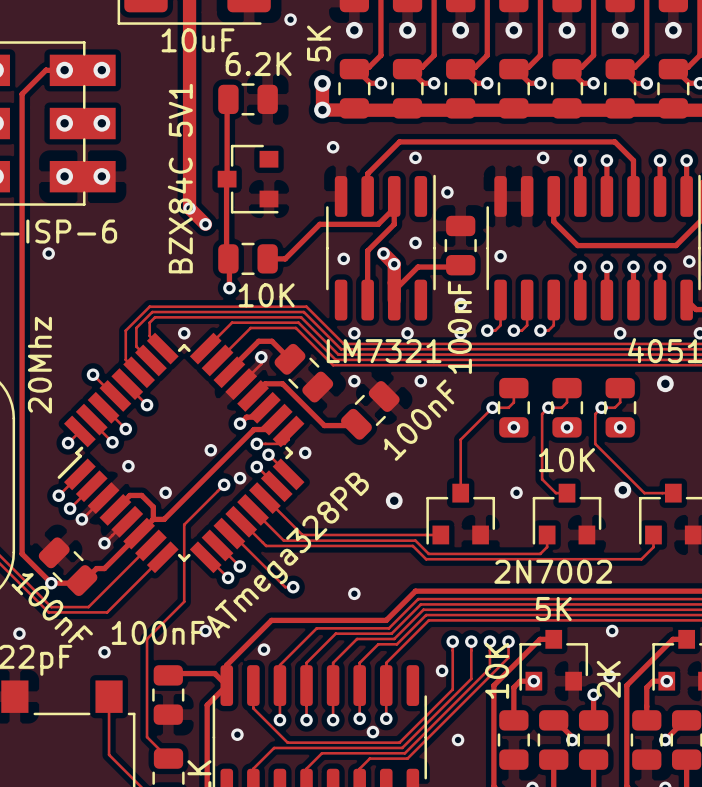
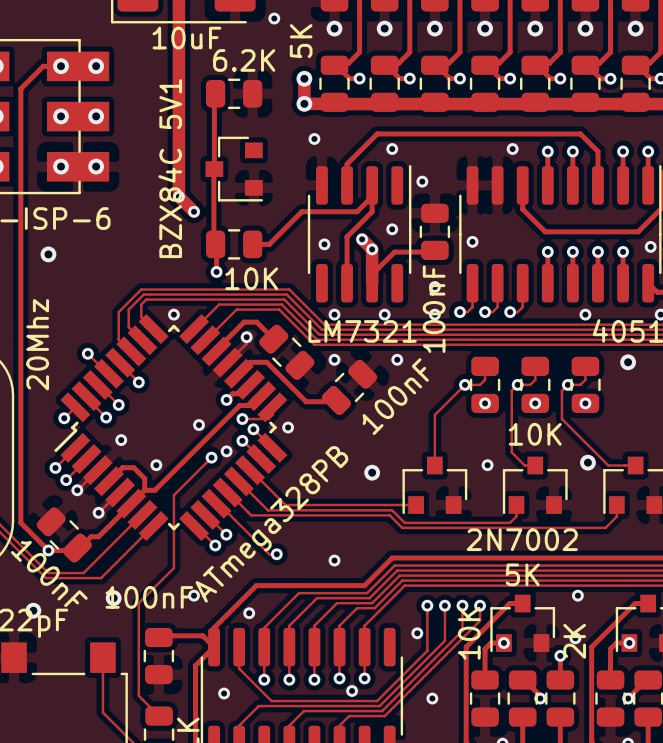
via: (48, 253) -> none
via: none -> (48, 254)
via: (19, 633) -> none
via: none -> (113, 598)
via: none -> (33, 610)
via: (104, 652) -> none

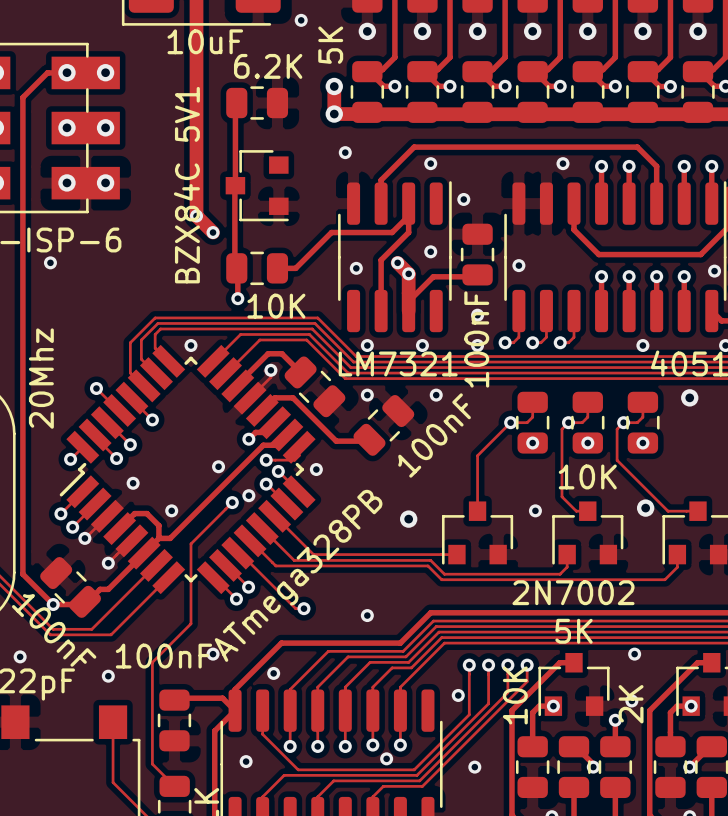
via: none -> (50, 262)
via: (48, 254) -> none
via: none -> (20, 656)
via: (113, 598) -> none
via: (33, 610) -> none
via: none -> (108, 676)

